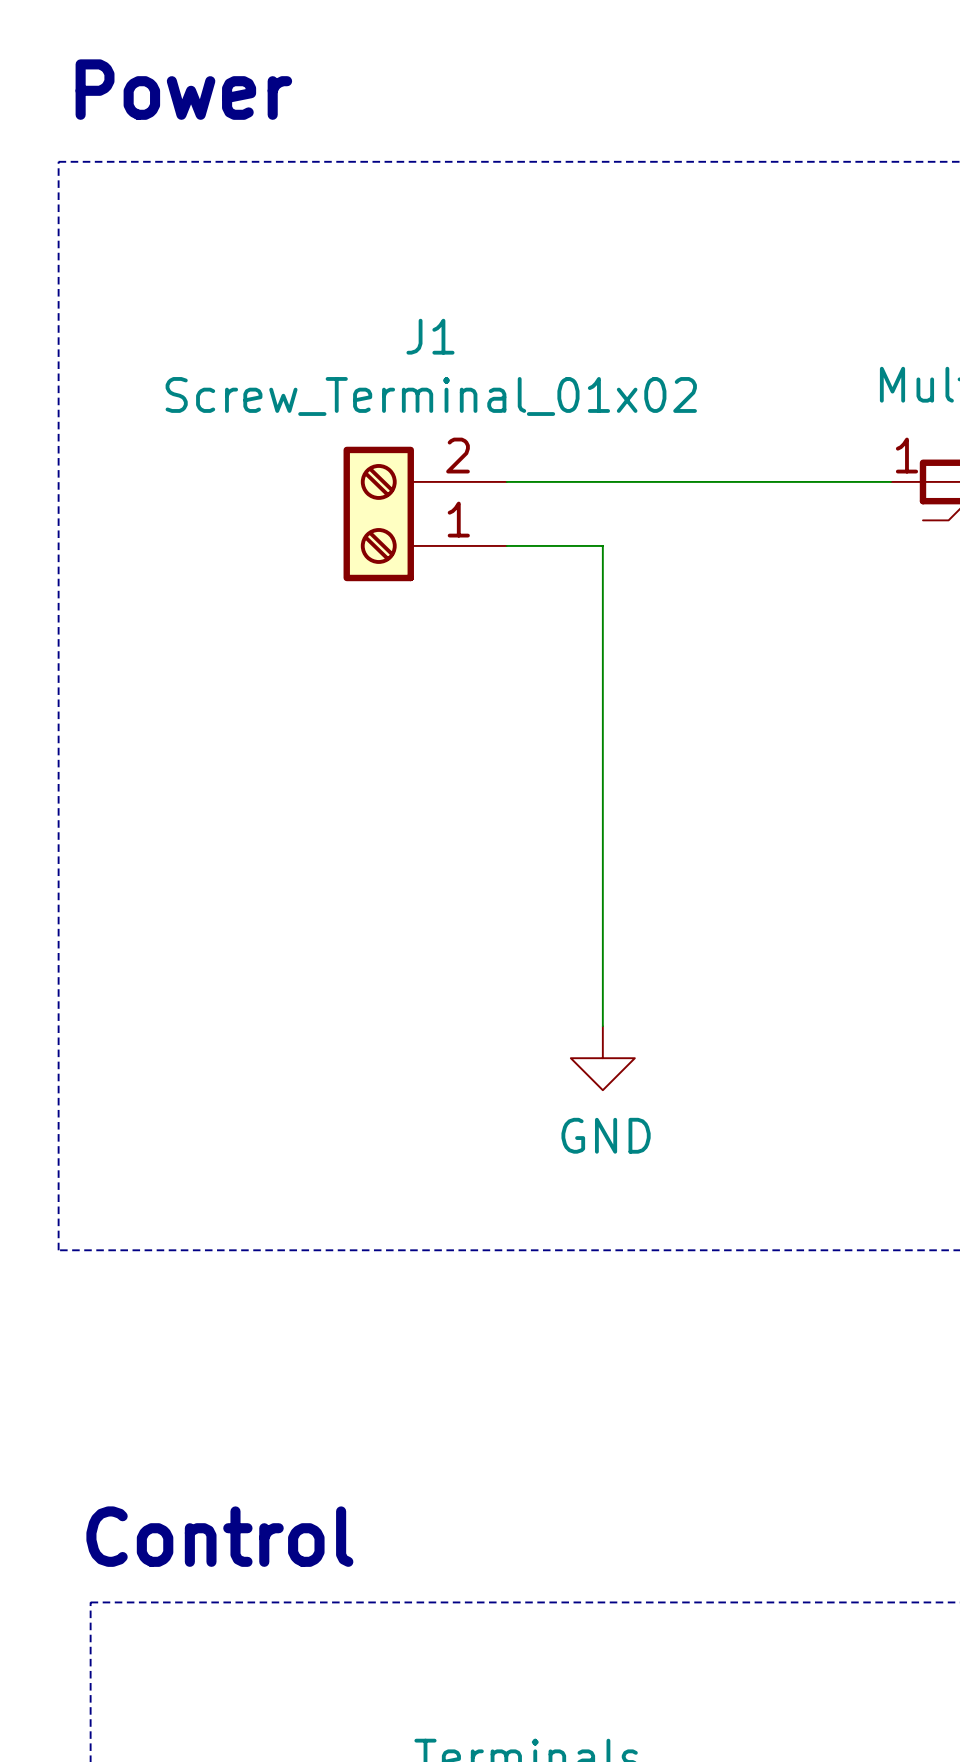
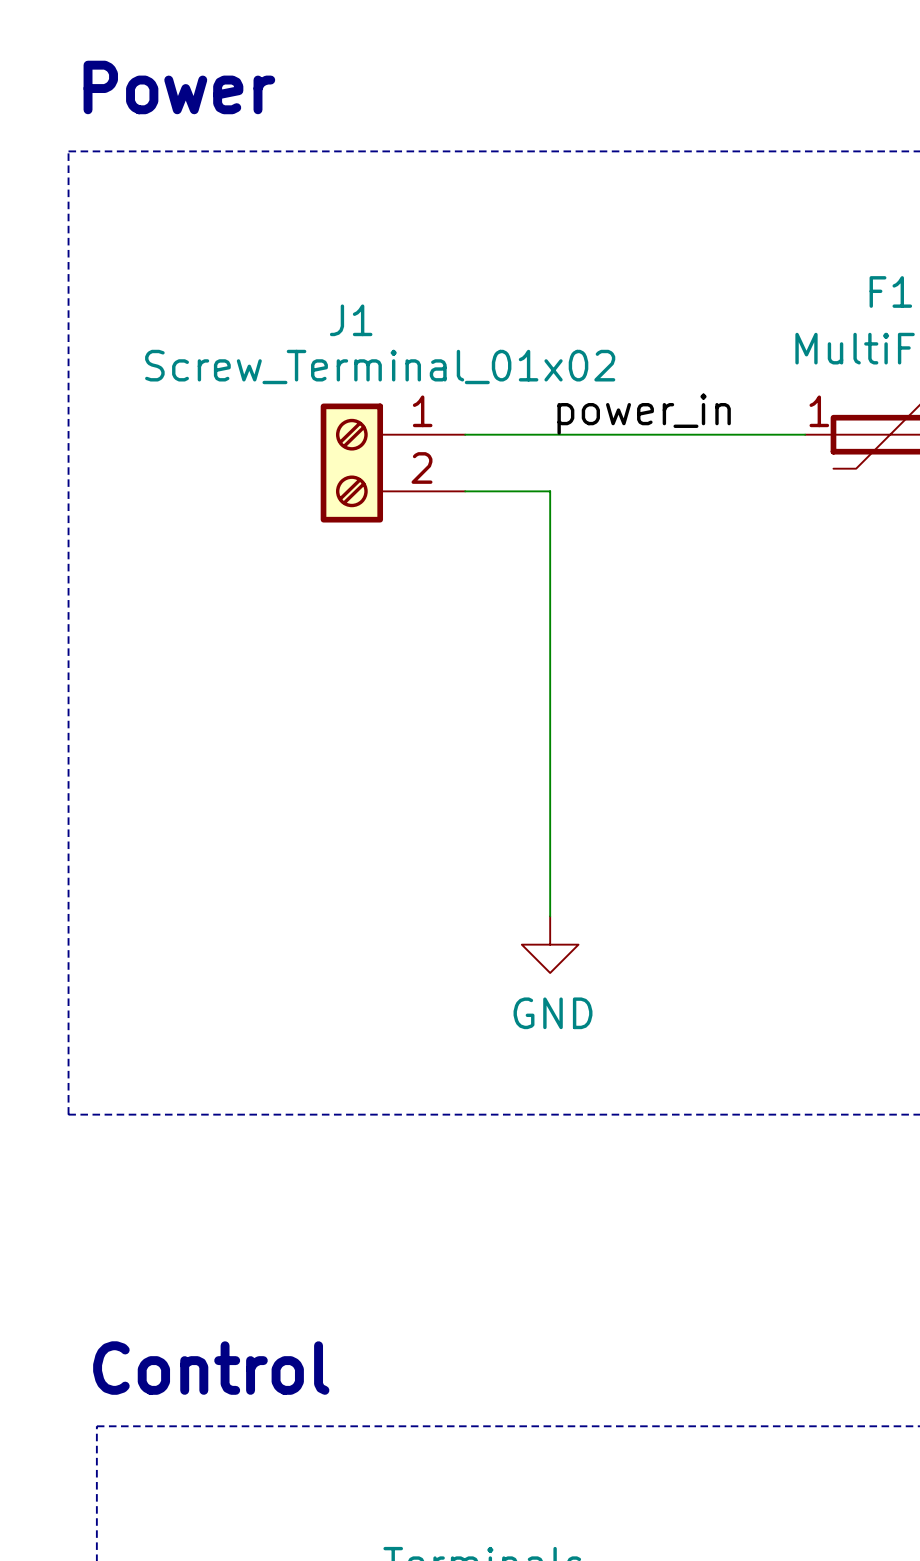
J1 name position: J1 (430, 336) -> J1 (351, 320)
label: none -> power_in (644, 414)
J1 flip: as is (378, 513) -> up-down (351, 463)

